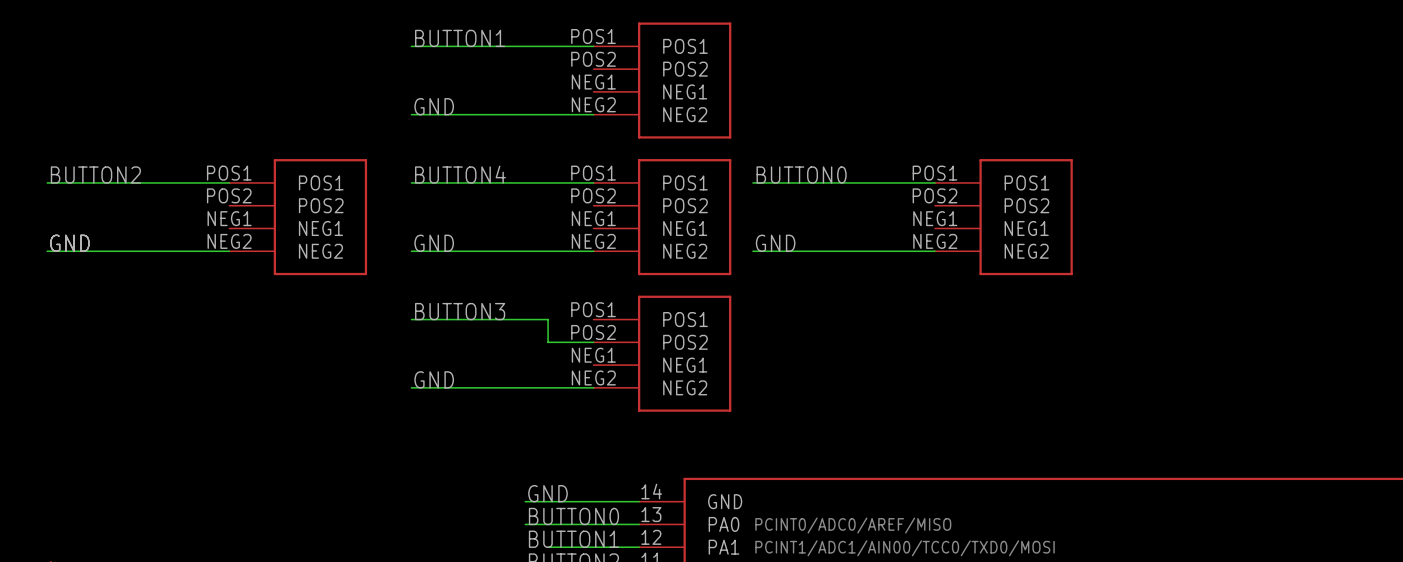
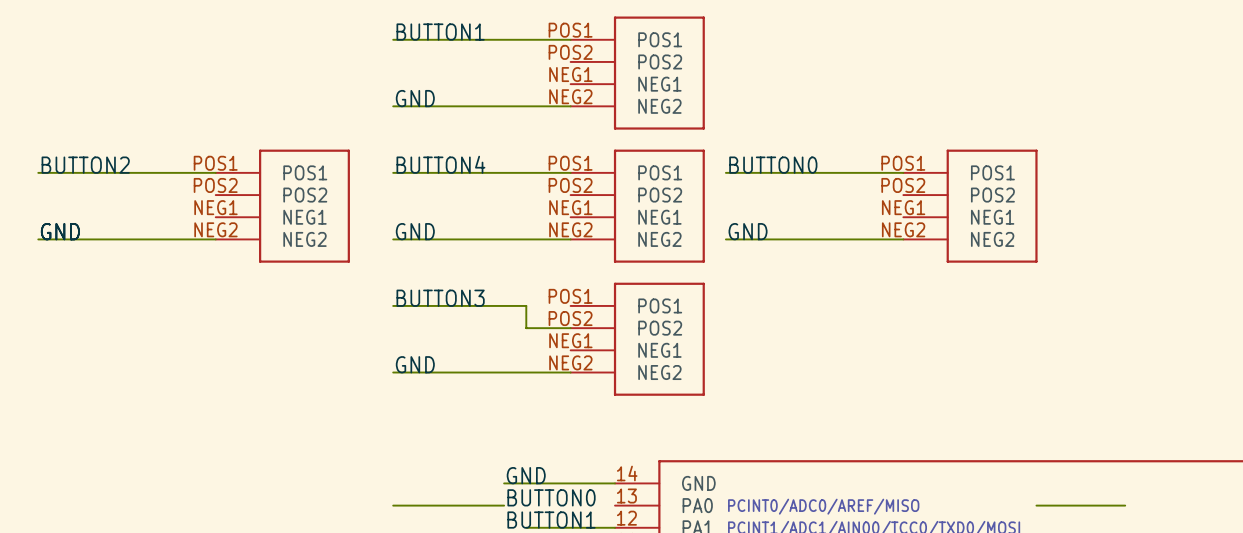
wire: (525, 524) (639, 524) -> (504, 505) (393, 505)
wire: none -> (1036, 505) (1125, 505)

